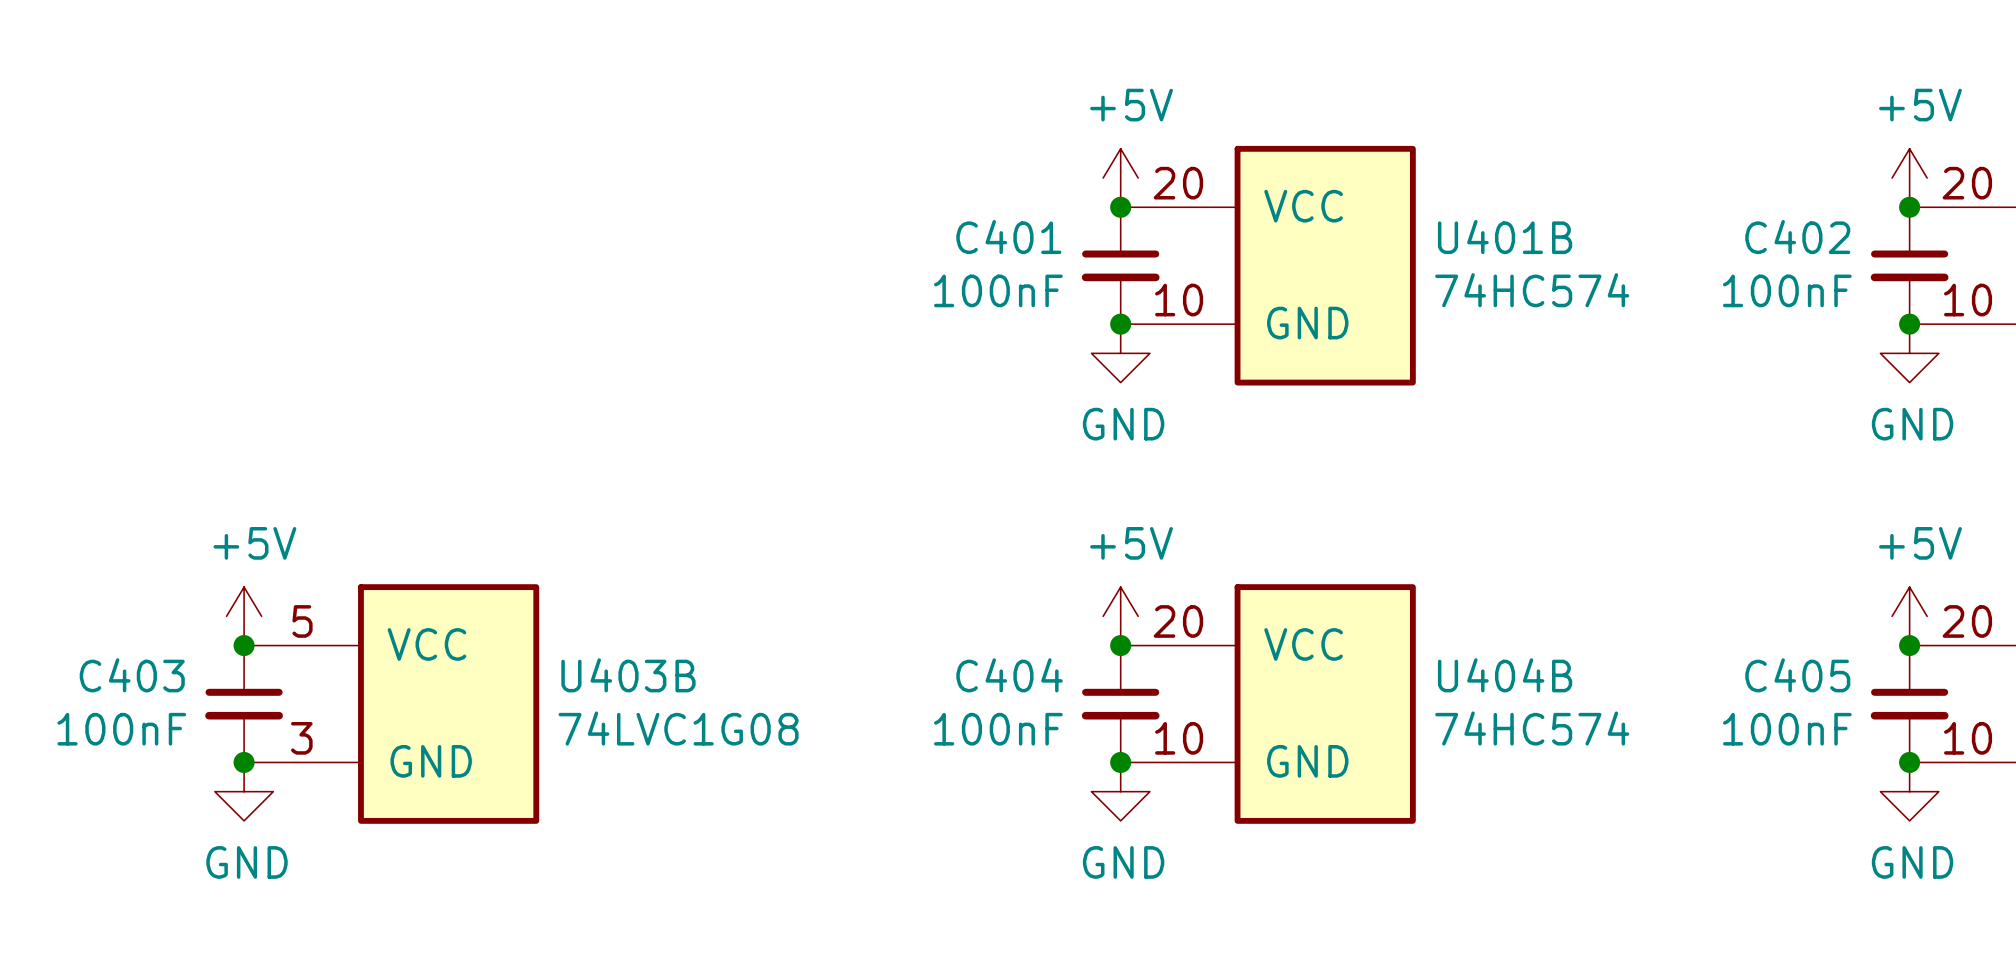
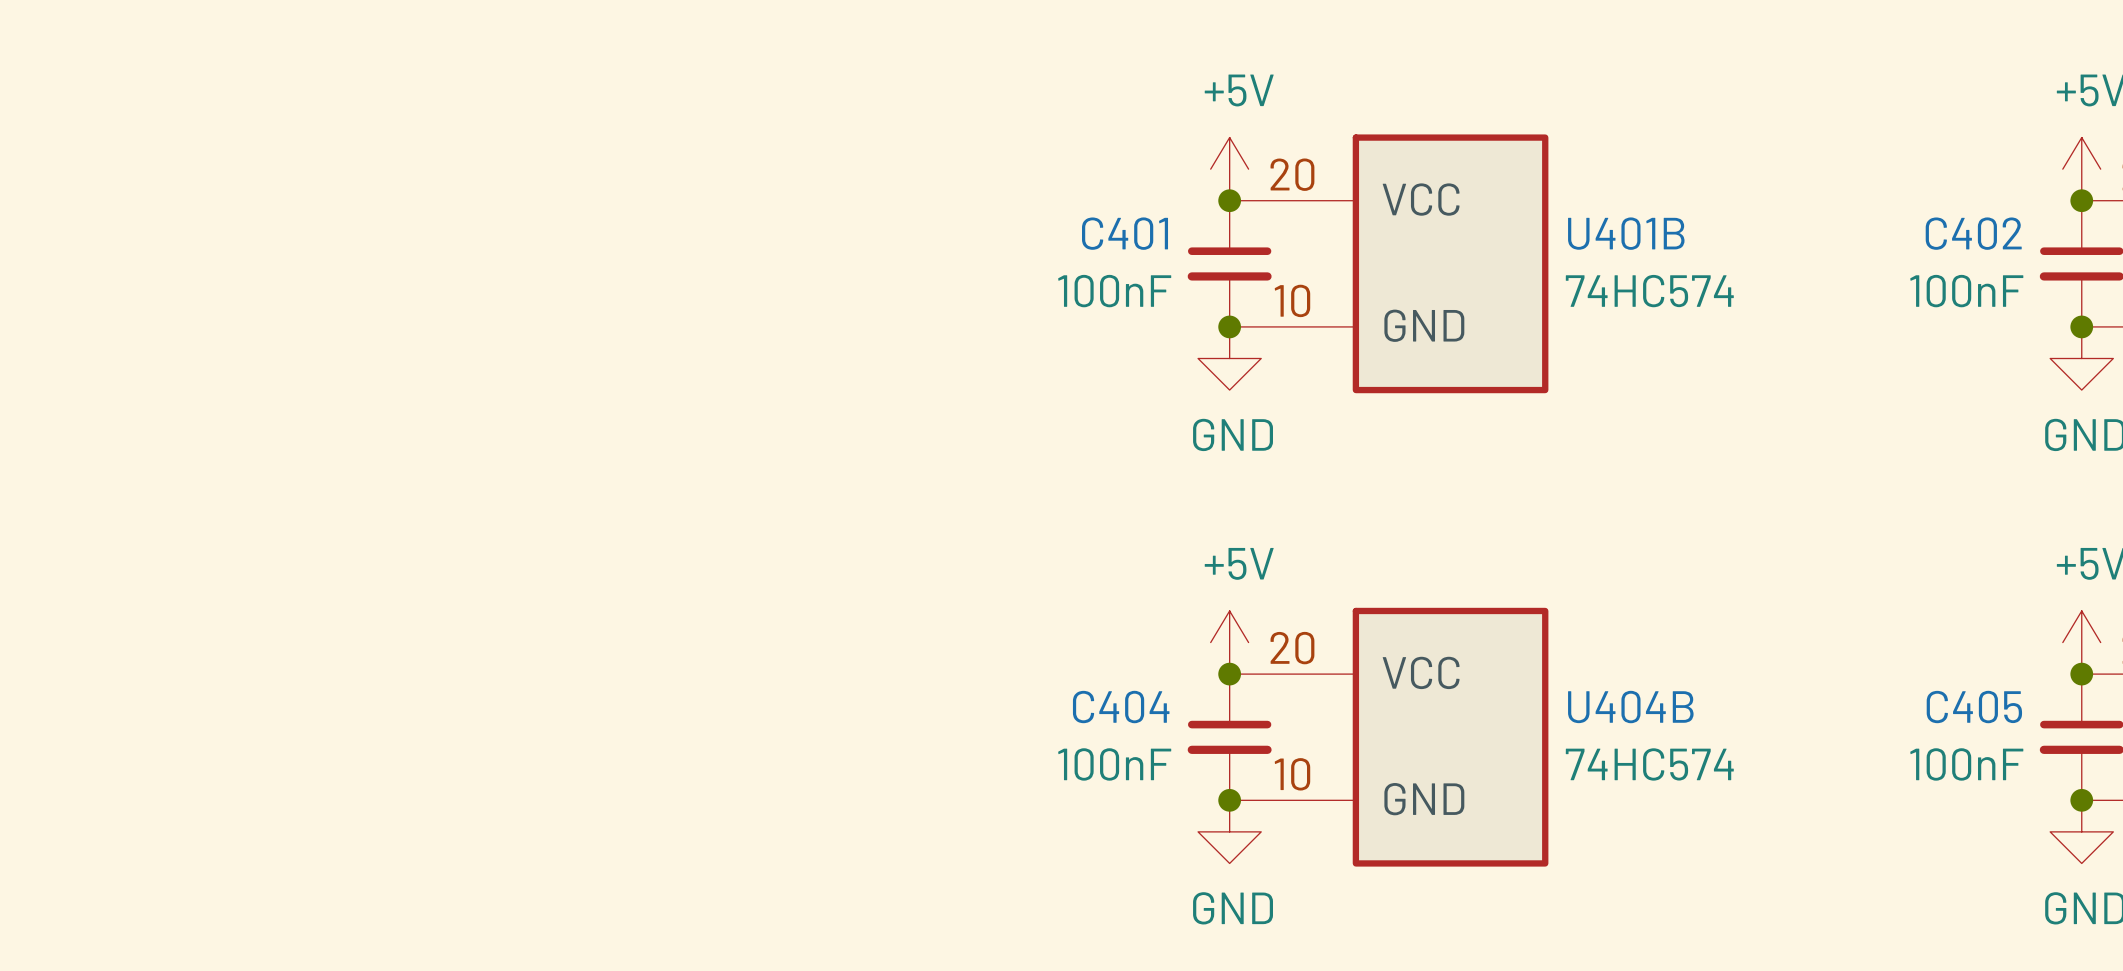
power symbol: +5V (244, 616) -> none
junction: (244, 645) -> none
C403: 100nF (244, 704) -> none
U403B: 74LVC1G08 (391, 704) -> none
junction: (244, 762) -> none
power symbol: GND (244, 791) -> none

